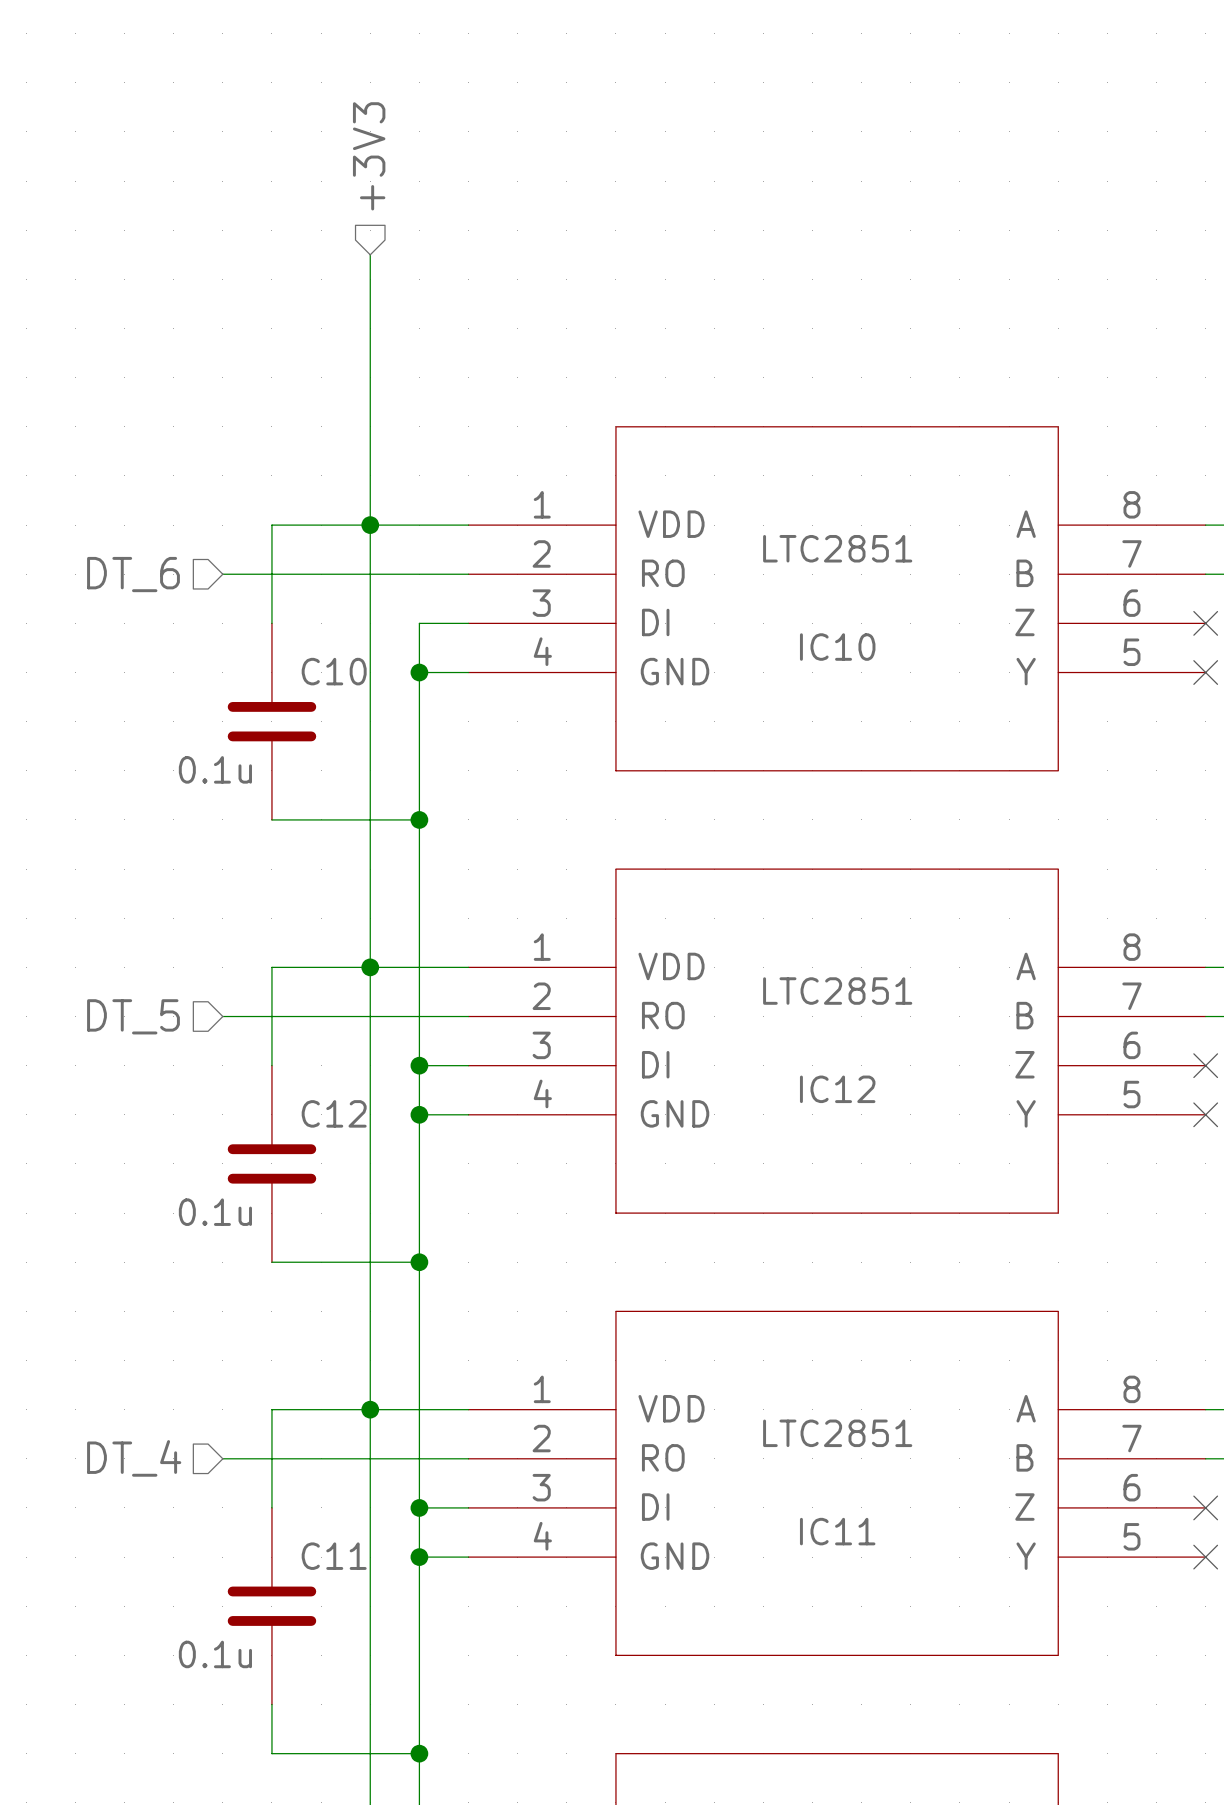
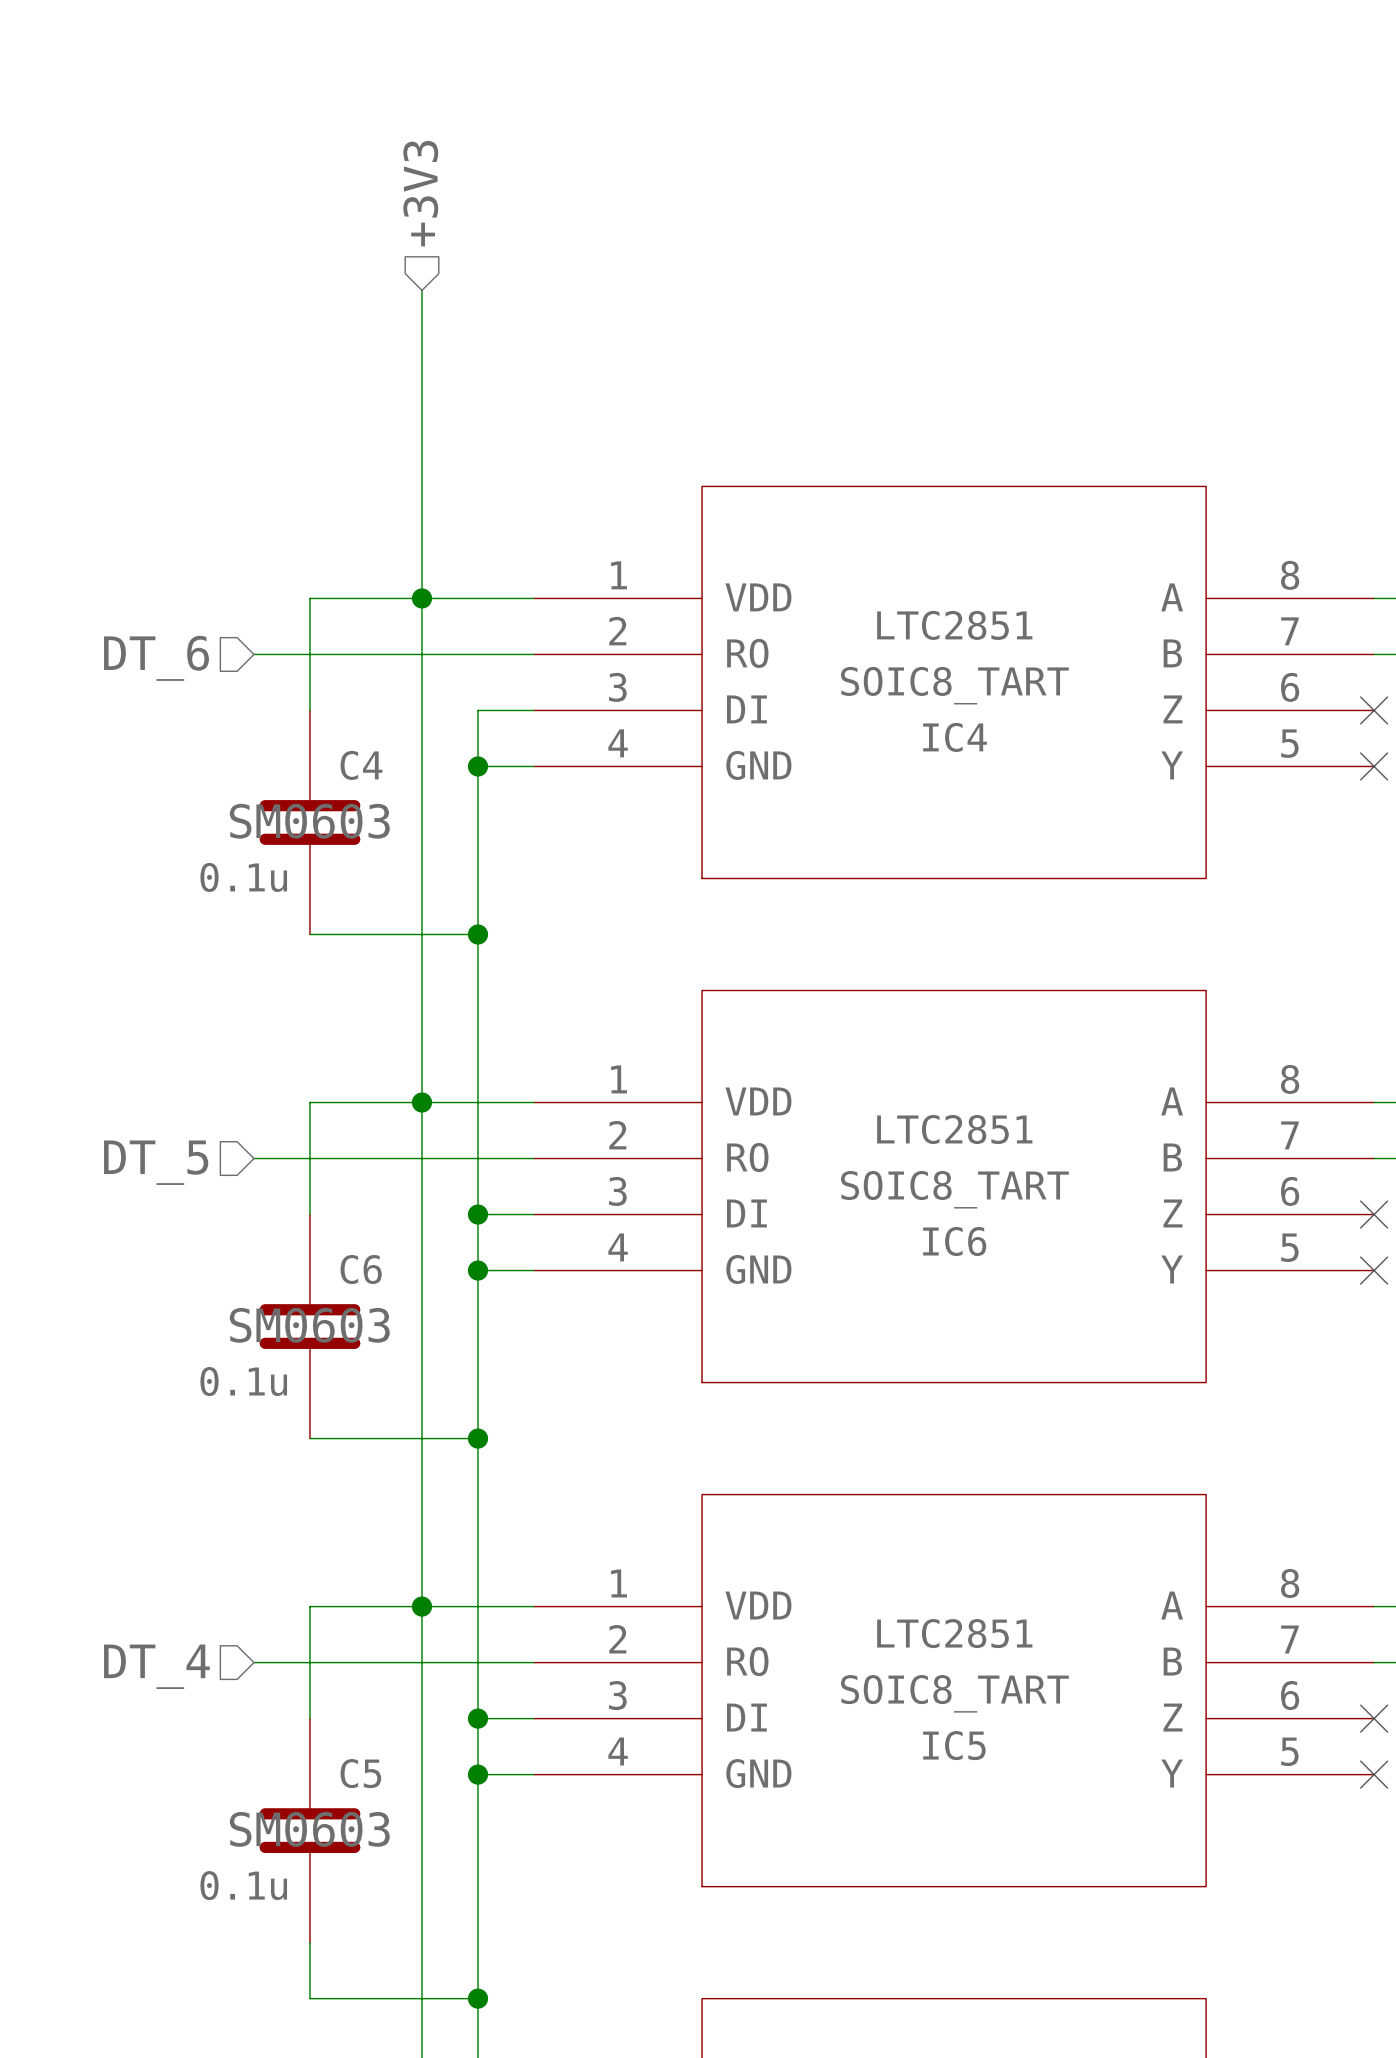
IC10 text: none -> SOIC8_TART (954, 685)
IC10 name: IC10 (837, 647) -> IC4 (955, 737)
C10 name: C10 (334, 671) -> C4 (361, 765)
C10 text: none -> SM0603 (309, 821)
IC12 text: none -> SOIC8_TART (954, 1189)
IC12 name: IC12 (837, 1089) -> IC6 (954, 1241)
C12 name: C12 (334, 1113) -> C6 (361, 1269)
C12 text: none -> SM0603 (309, 1325)
IC11 text: none -> SOIC8_TART (954, 1693)
IC11 name: IC11 (837, 1531) -> IC5 (954, 1745)
C11 name: C11 (334, 1556) -> C5 (360, 1773)
C11 text: none -> SM0603 (309, 1829)

